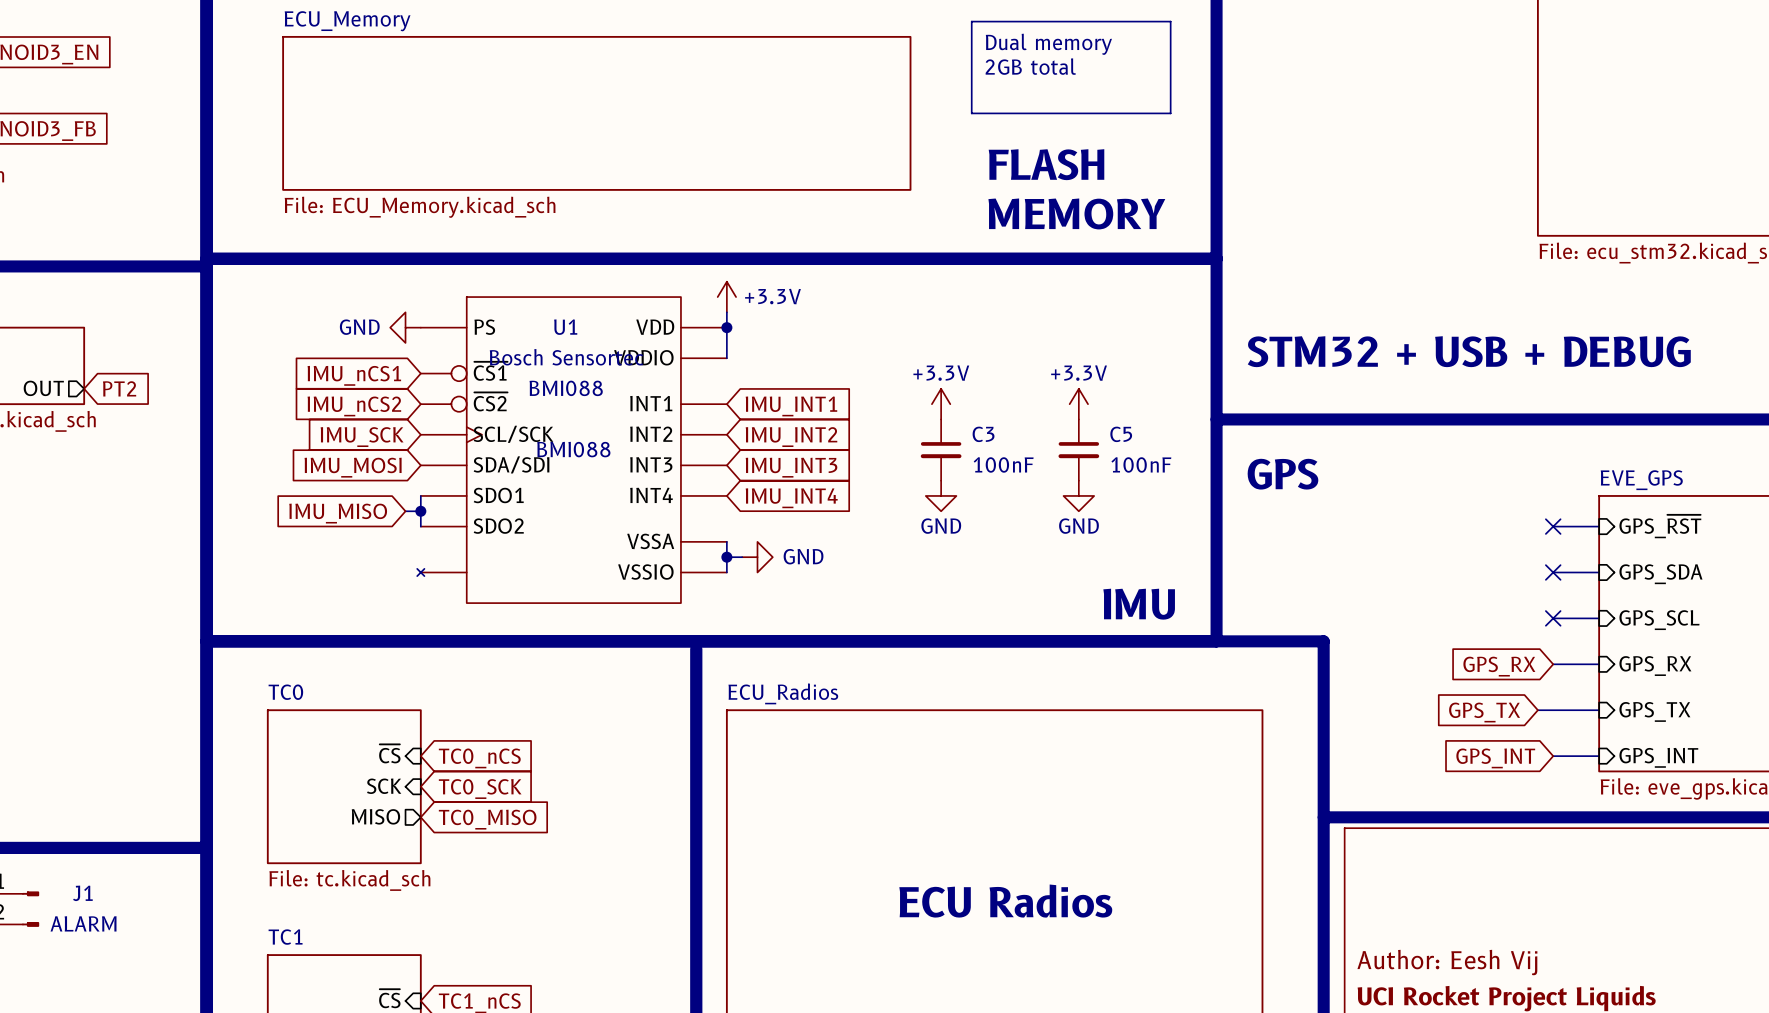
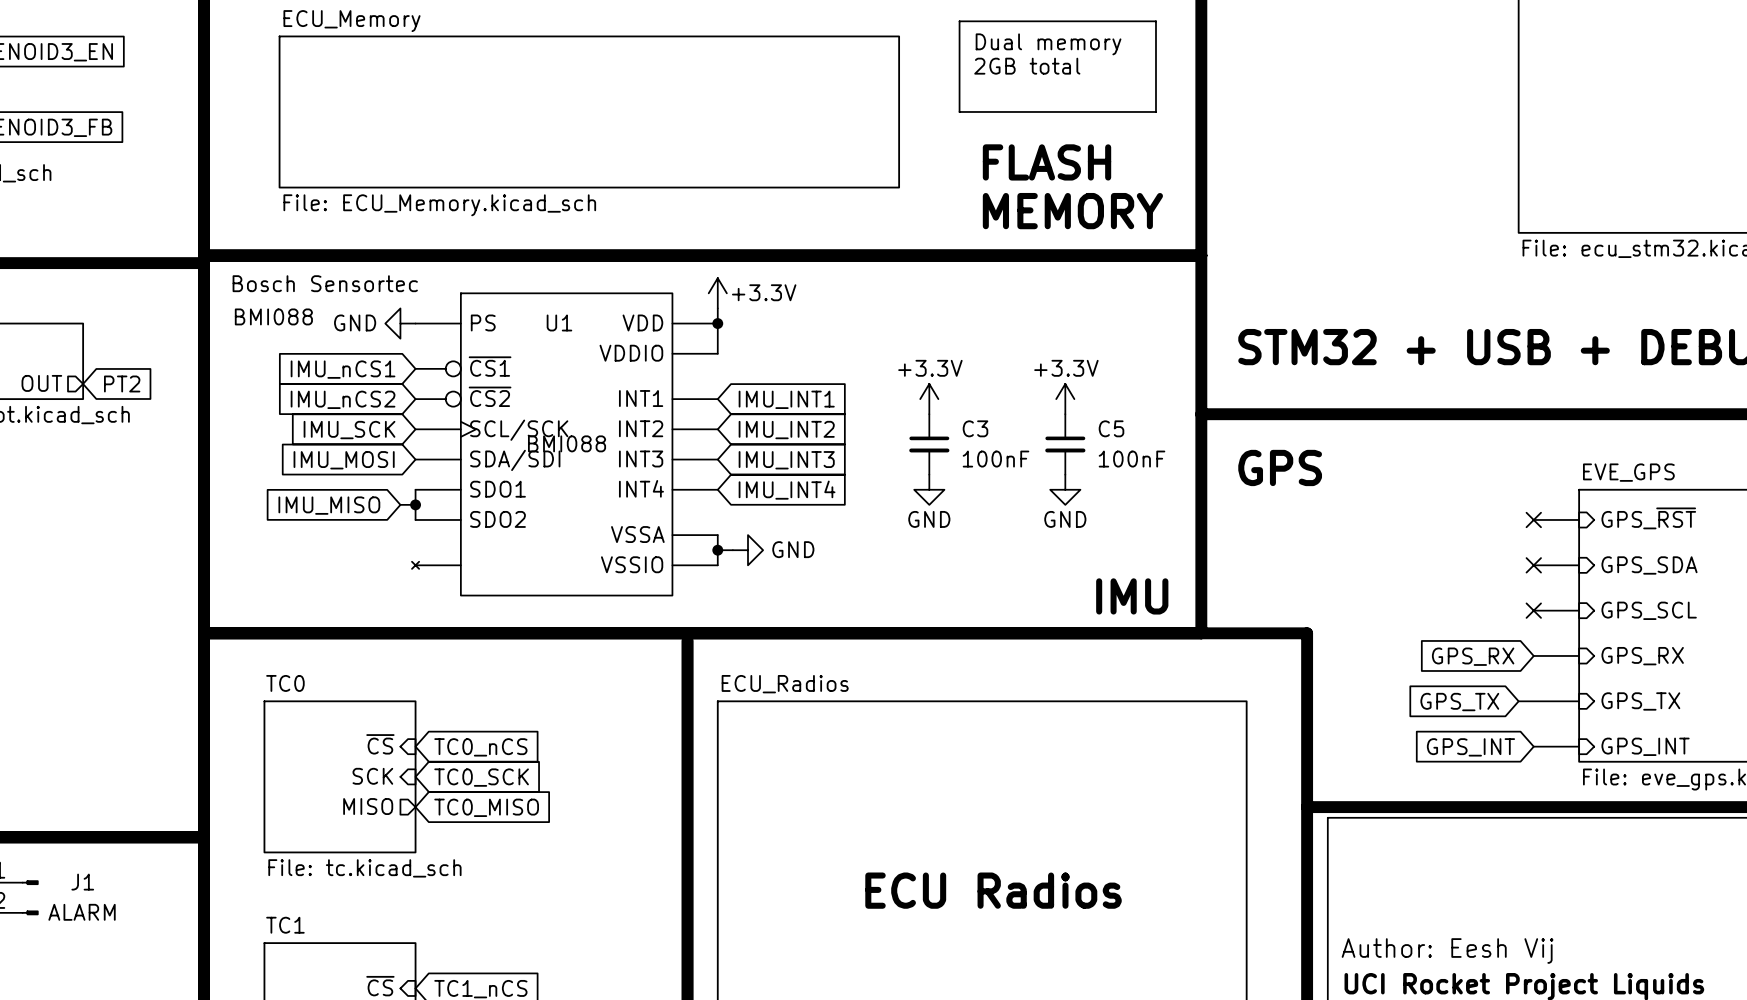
U1 text position: Bosch Sensortec (566, 357) -> Bosch Sensortec (325, 283)
U1 text position: BMI088 (566, 388) -> BMI088 (273, 316)

